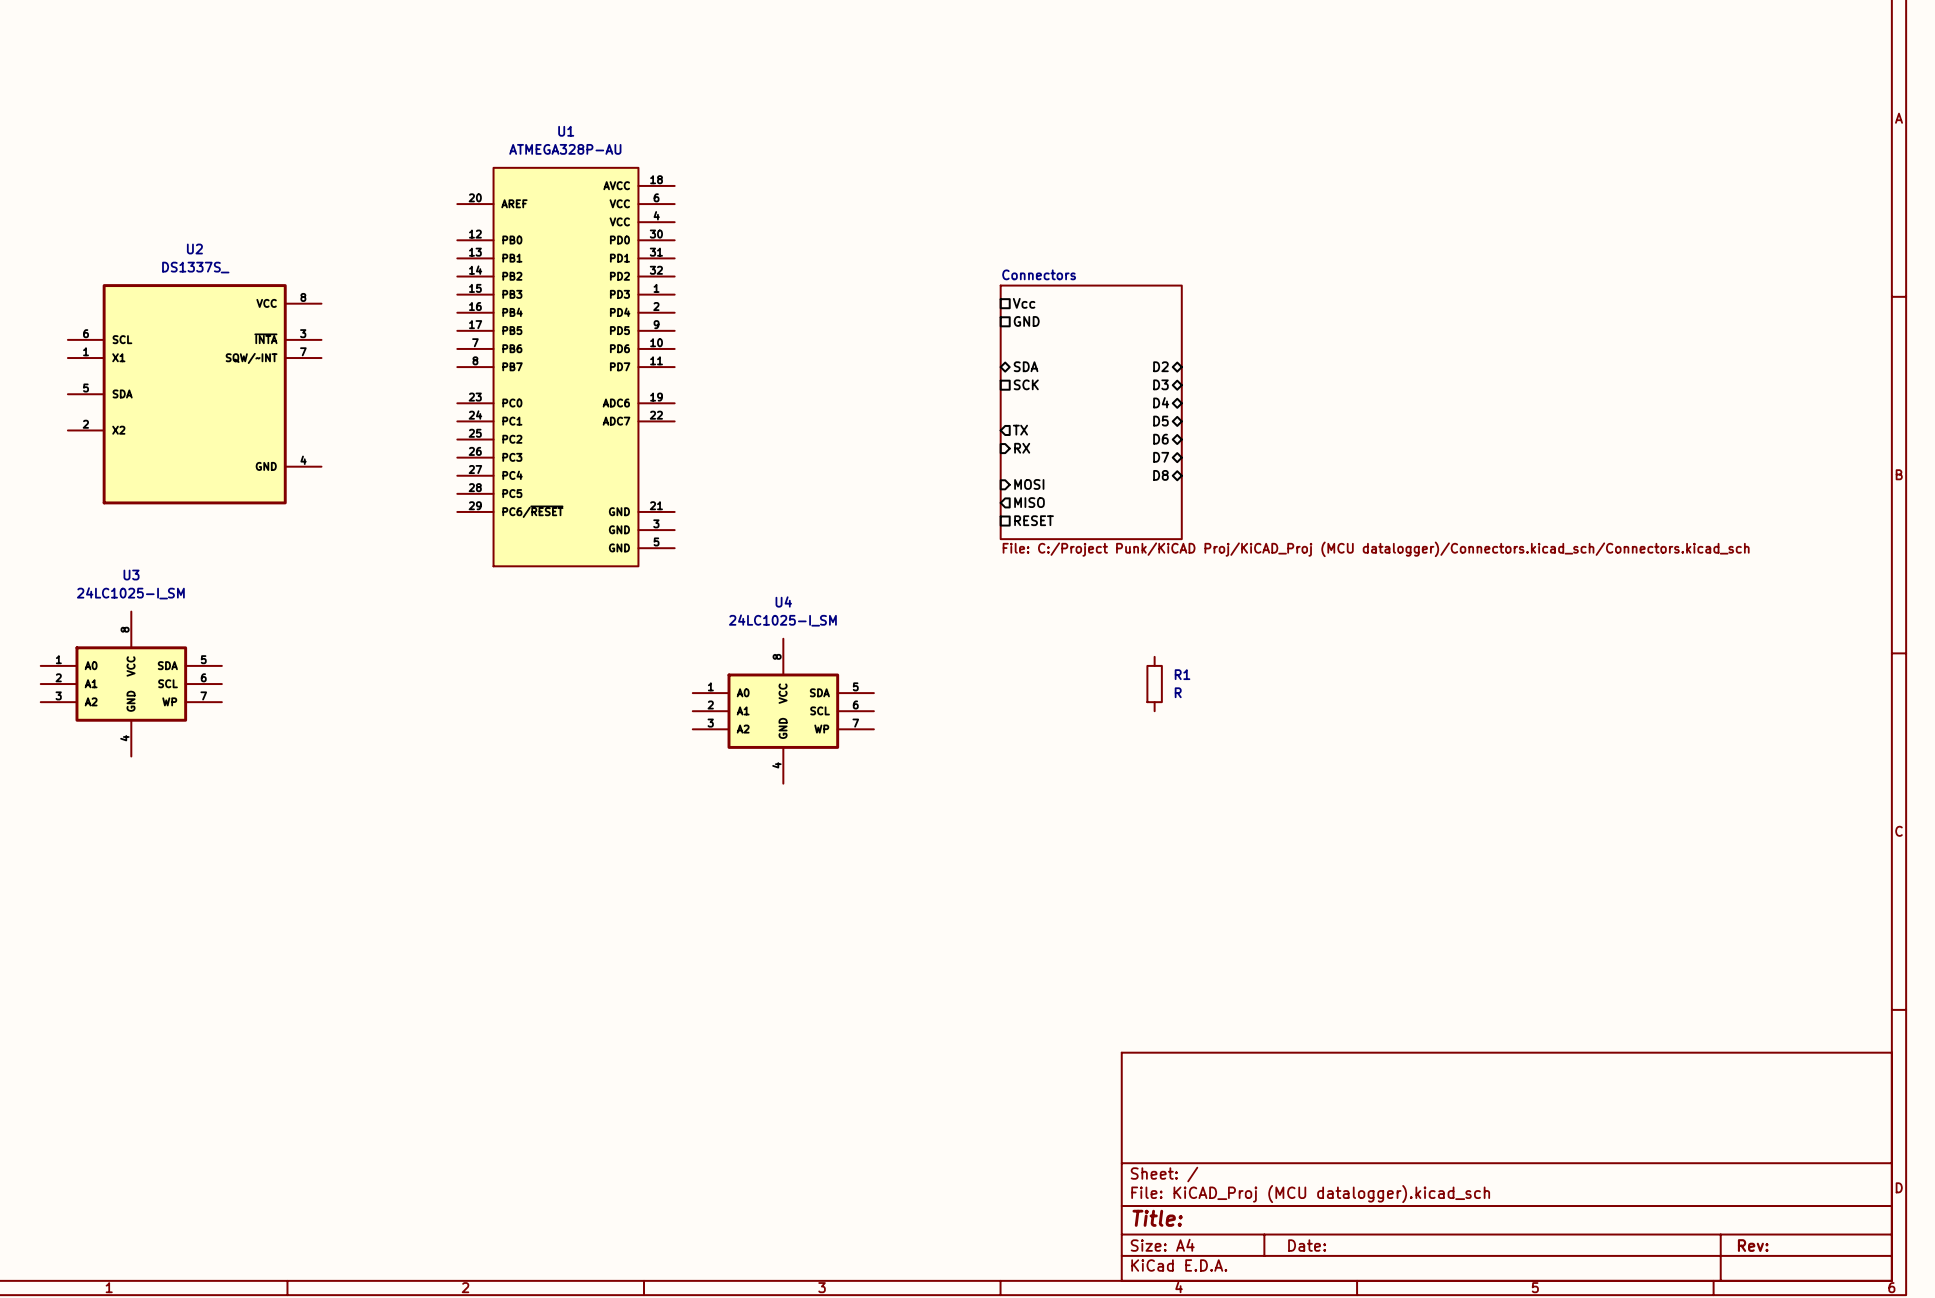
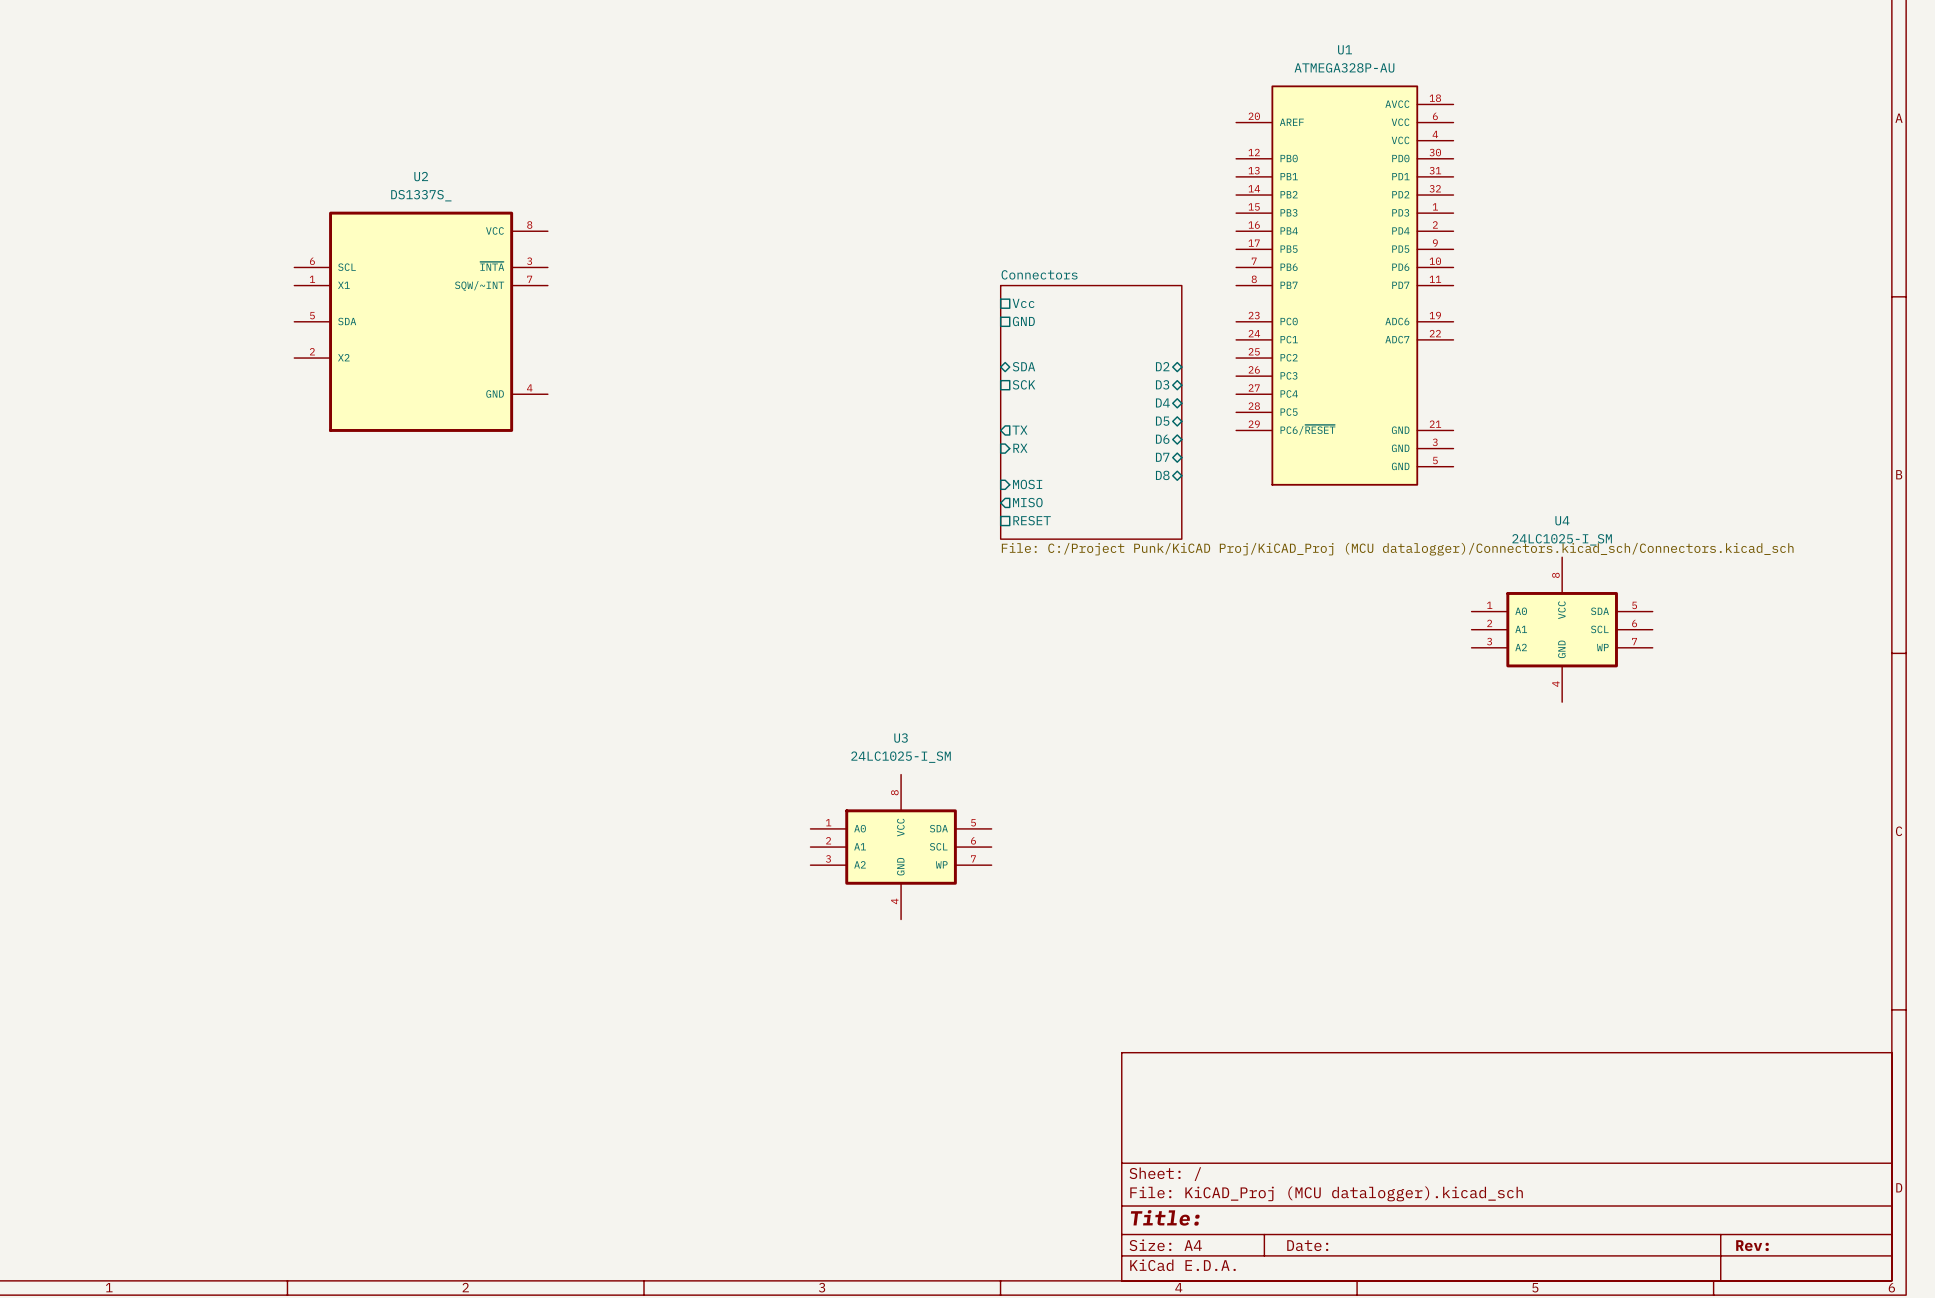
U1 position: (565, 367) -> (1344, 285)
U2 position: (194, 394) -> (421, 321)
U3 position: (131, 684) -> (901, 847)
R1: R (1154, 684) -> none
U4 position: (783, 711) -> (1562, 629)

